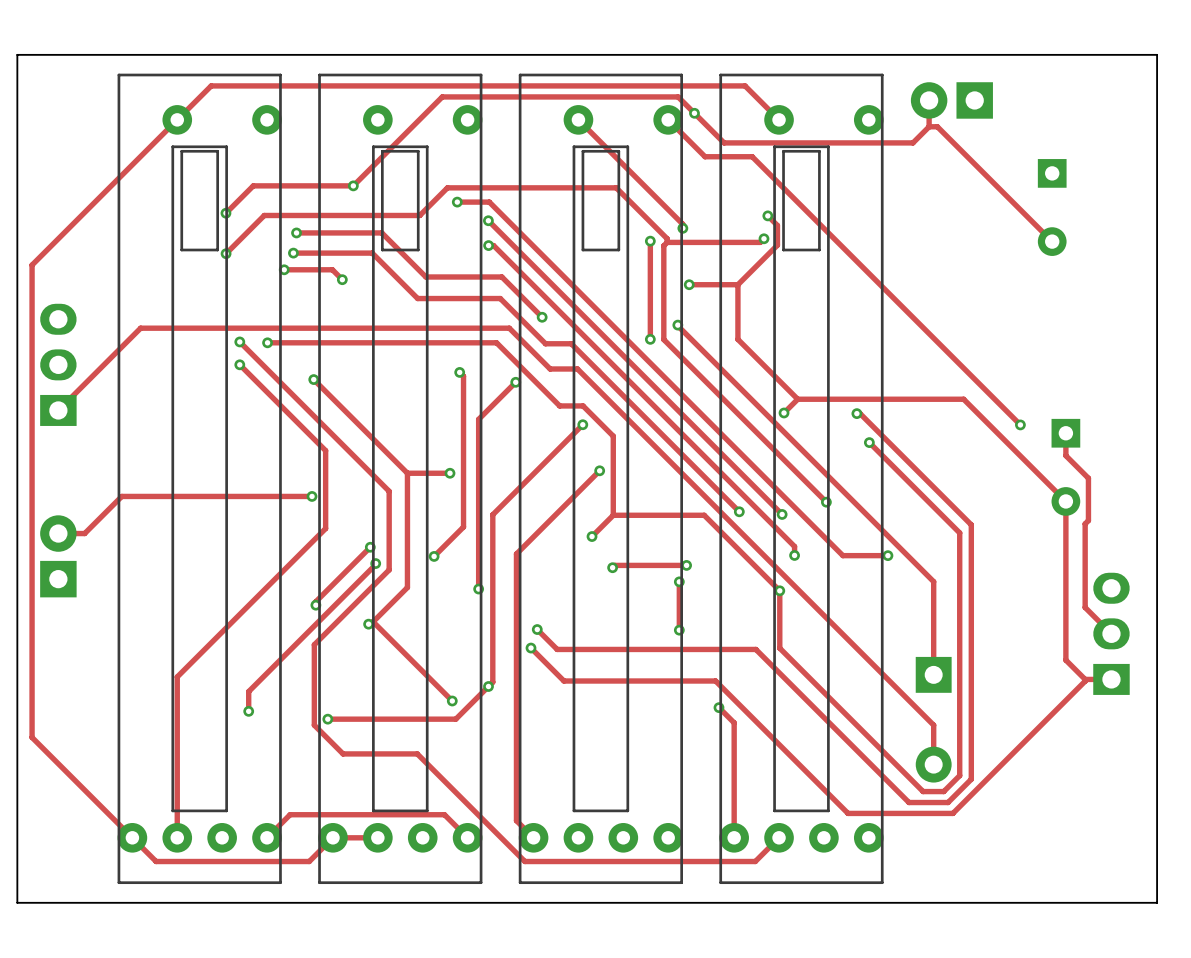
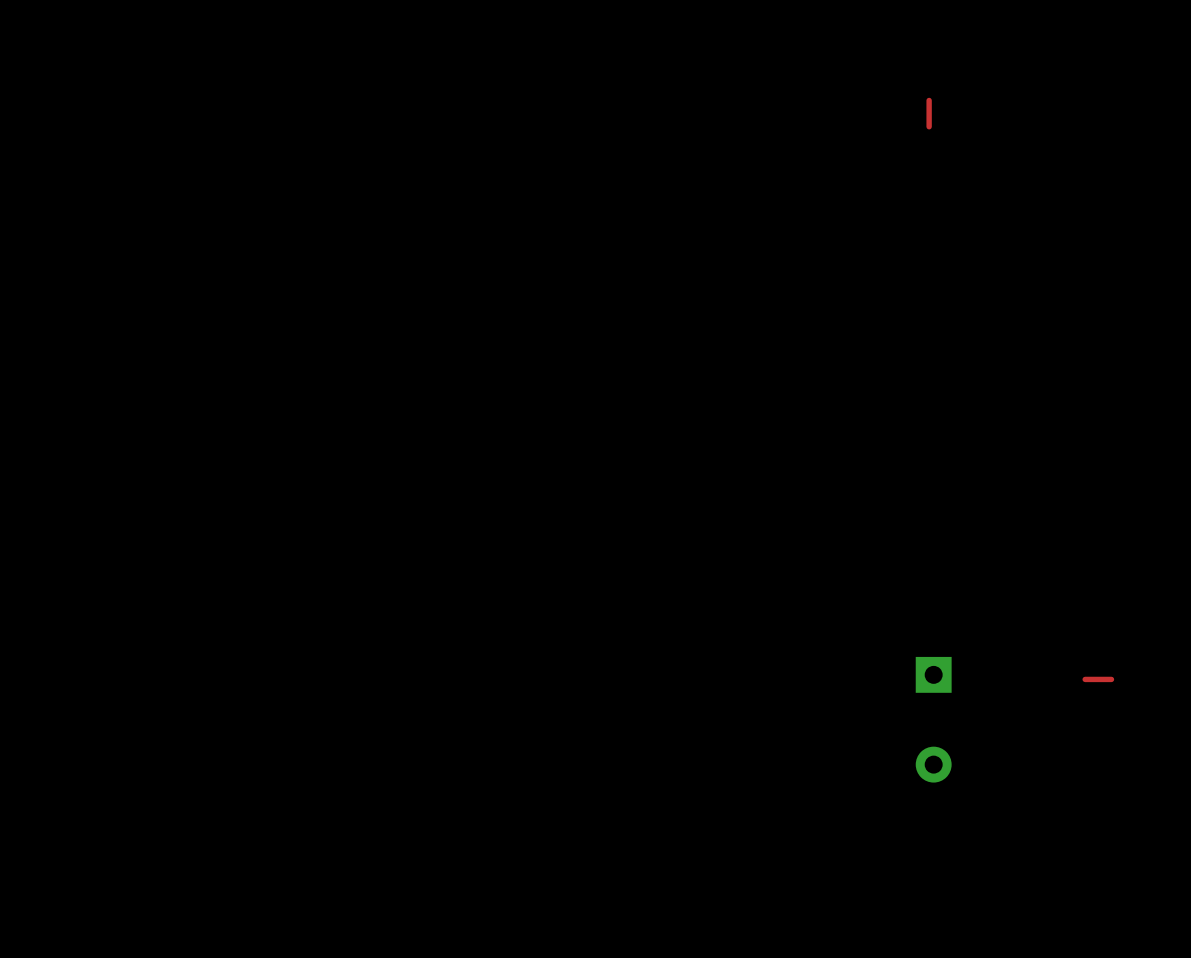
board edge: (17, 54) (17, 902) (1157, 902) (1157, 54) (17, 54) -> none
part: (951, 100) -> none
via: (694, 113) -> none
track: (578, 119) (682, 224) (682, 228) -> none
track: (668, 119) (705, 156) (752, 156) (1020, 424) -> none
track: (779, 119) (745, 85) (211, 85) (32, 265) (32, 737) (156, 861) (309, 861) (332, 837) (377, 837) -> none
via: (353, 185) -> none
track: (457, 202) (489, 202) (842, 555) (887, 555) -> none
via: (457, 202) -> none
part: (1052, 207) -> none
track: (225, 213) (253, 185) (353, 185) (442, 96) (678, 96) (724, 142) (912, 142) (929, 126) (937, 126) (1052, 241) -> none
via: (225, 213) -> none
track: (767, 215) (777, 225) (777, 245) (737, 284) -> none
via: (767, 215) -> none
track: (488, 220) (782, 514) -> none
via: (488, 220) -> none
via: (682, 228) -> none
track: (296, 232) (381, 232) (425, 276) (501, 276) (542, 317) -> none
via: (296, 232) -> none
track: (763, 238) (760, 242) (667, 242) -> none
via: (763, 238) -> none
track: (650, 241) (650, 339) -> none
via: (650, 241) -> none
track: (667, 242) (663, 245) (663, 339) (826, 502) -> none
track: (667, 242) (667, 238) (616, 187) (447, 187) (419, 215) (264, 215) (226, 253) -> none
track: (488, 245) (493, 245) (794, 546) (794, 555) -> none
via: (488, 245) -> none
via: (226, 253) -> none
track: (293, 253) (372, 253) (417, 298) (500, 298) (545, 343) (571, 343) (739, 511) -> none
via: (293, 253) -> none
track: (284, 269) (332, 269) (342, 279) -> none
via: (284, 269) -> none
via: (342, 279) -> none
track: (689, 284) (737, 284) -> none
via: (689, 284) -> none
track: (737, 284) (737, 339) (797, 399) -> none
via: (542, 317) -> none
track: (677, 325) (933, 581) (933, 674) -> none
via: (677, 325) -> none
via: (650, 339) -> none
track: (239, 341) (389, 491) (389, 569) (314, 644) (314, 725) (343, 753) (417, 753) (524, 861) (755, 861) (779, 837) -> none
via: (239, 341) -> none
track: (267, 342) (496, 342) (559, 405) (583, 405) (613, 436) (613, 515) -> none
via: (267, 342) -> none
part: (58, 364) -> none
track: (239, 364) (325, 450) (325, 528) (177, 676) (177, 837) -> none
via: (239, 364) -> none
track: (459, 372) (463, 376) (463, 527) (434, 556) -> none
via: (459, 372) -> none
track: (313, 379) (407, 473) -> none
via: (313, 379) -> none
track: (515, 382) (478, 419) (478, 589) -> none
via: (515, 382) -> none
track: (797, 399) (784, 412) -> none
track: (797, 399) (963, 399) (1065, 501) (1065, 660) (1085, 681) (952, 813) (848, 813) (715, 681) (563, 681) (530, 648) -> none
track: (58, 410) (140, 328) (509, 328) (550, 368) (577, 368) (933, 725) (933, 764) -> none
via: (784, 412) -> none
track: (856, 413) (860, 413) (971, 524) (971, 779) (948, 802) (908, 802) (755, 649) (557, 649) (537, 629) -> none
via: (856, 413) -> none
track: (582, 424) (492, 514) (492, 682) (455, 719) (327, 719) -> none
via: (582, 424) -> none
via: (1020, 424) -> none
track: (1065, 433) (1065, 455) (1088, 478) (1088, 520) (1085, 523) (1085, 607) (1111, 633) -> none
track: (869, 442) (959, 532) (959, 775) (943, 791) (923, 791) (779, 648) (779, 590) (704, 515) (613, 515) -> none
via: (869, 442) -> none
part: (1065, 467) -> none
track: (599, 470) (516, 554) (516, 820) (533, 837) -> none
via: (599, 470) -> none
track: (407, 473) (450, 473) -> none
track: (407, 473) (407, 587) (370, 624) (368, 624) -> none
via: (450, 473) -> none
part: (199, 478) -> none
part: (400, 478) -> none
part: (600, 478) -> none
part: (801, 478) -> none
track: (312, 496) (121, 496) (84, 533) (58, 533) -> none
via: (312, 496) -> none
via: (826, 502) -> none
via: (739, 511) -> none
via: (782, 514) -> none
track: (613, 515) (592, 536) -> none
via: (592, 536) -> none
track: (370, 547) (315, 601) (315, 605) -> none
via: (370, 547) -> none
via: (794, 555) -> none
via: (887, 555) -> none
part: (58, 556) -> none
via: (434, 556) -> none
track: (375, 563) (248, 691) (248, 711) -> none
via: (375, 563) -> none
track: (686, 565) (614, 565) (612, 567) -> none
via: (686, 565) -> none
via: (612, 567) -> none
track: (679, 581) (679, 630) -> none
via: (679, 581) -> none
via: (478, 589) -> none
via: (779, 590) -> none
via: (315, 605) -> none
track: (373, 621) (452, 701) -> none
via: (368, 624) -> none
via: (537, 629) -> none
via: (679, 630) -> none
part: (1111, 633) -> none
via: (530, 648) -> none
via: (488, 686) -> none
via: (452, 701) -> none
track: (718, 707) (734, 722) (734, 837) -> none
via: (718, 707) -> none
via: (248, 711) -> none
via: (327, 719) -> none
track: (267, 837) (290, 814) (444, 814) (467, 837) -> none

